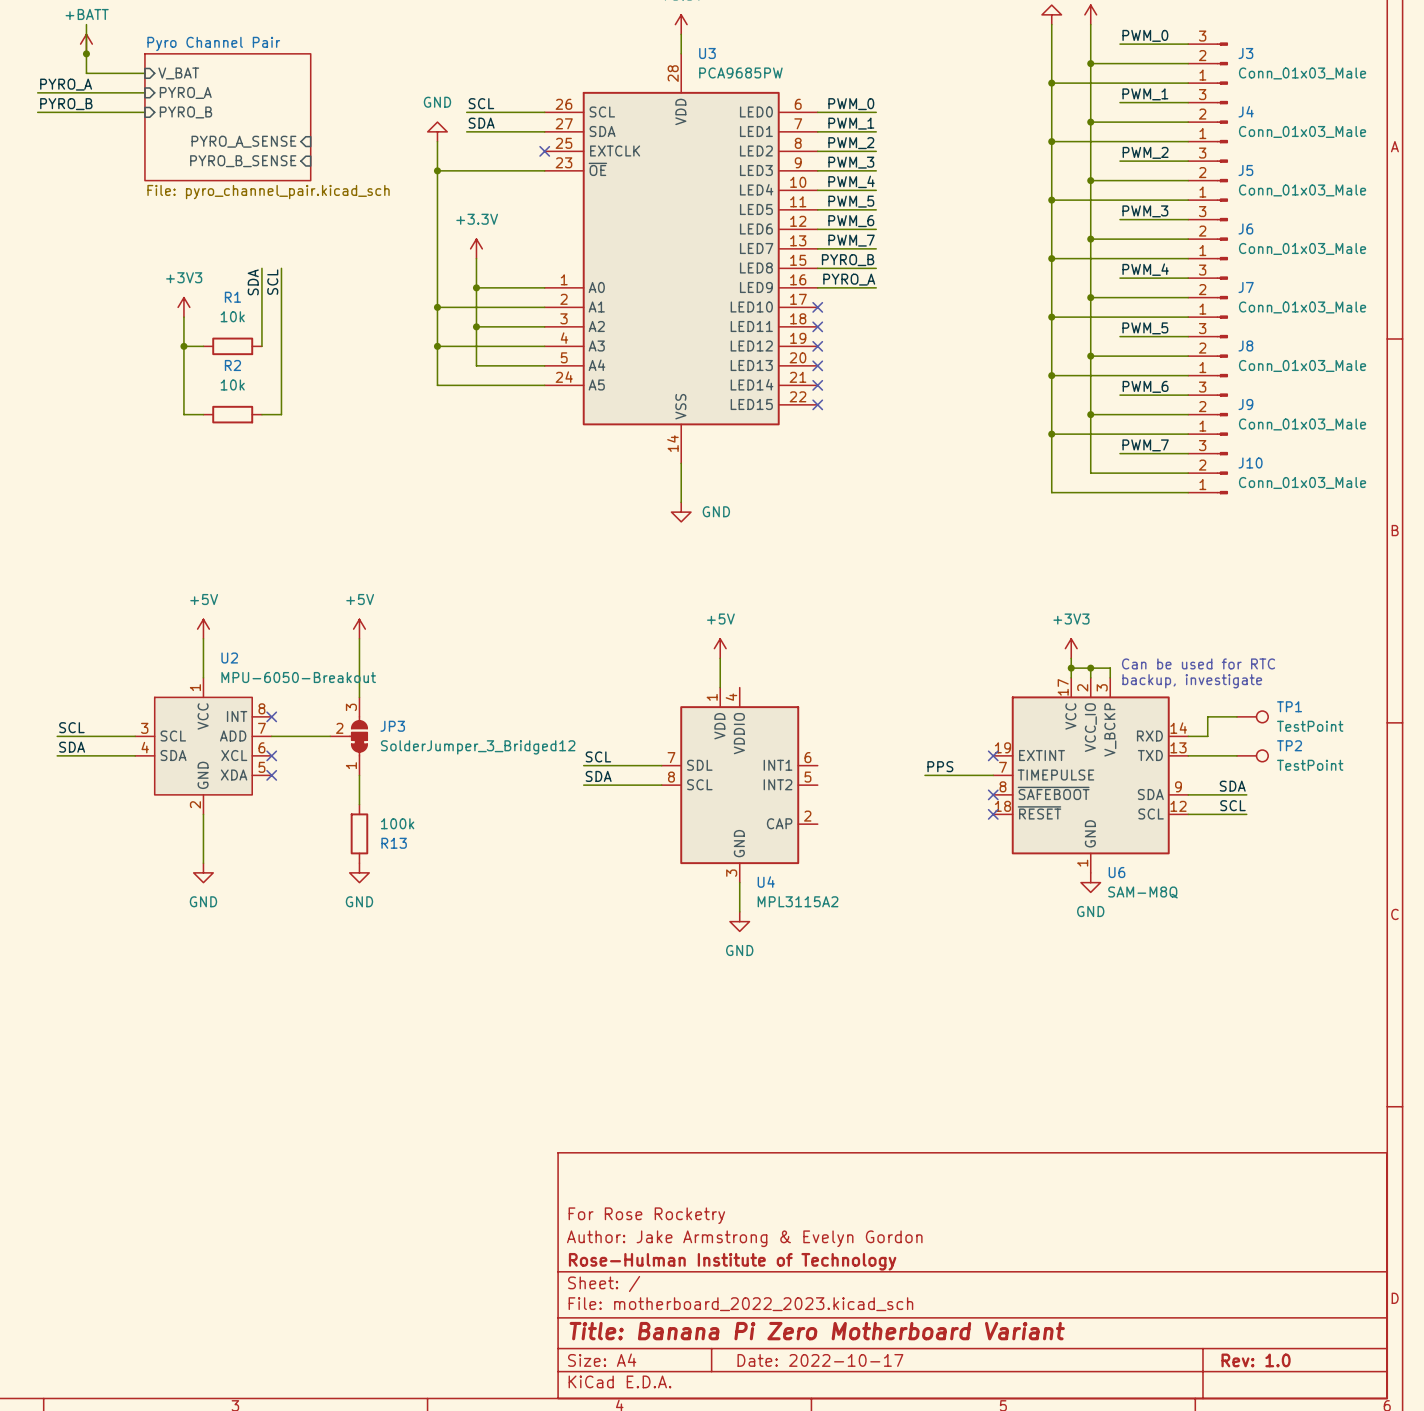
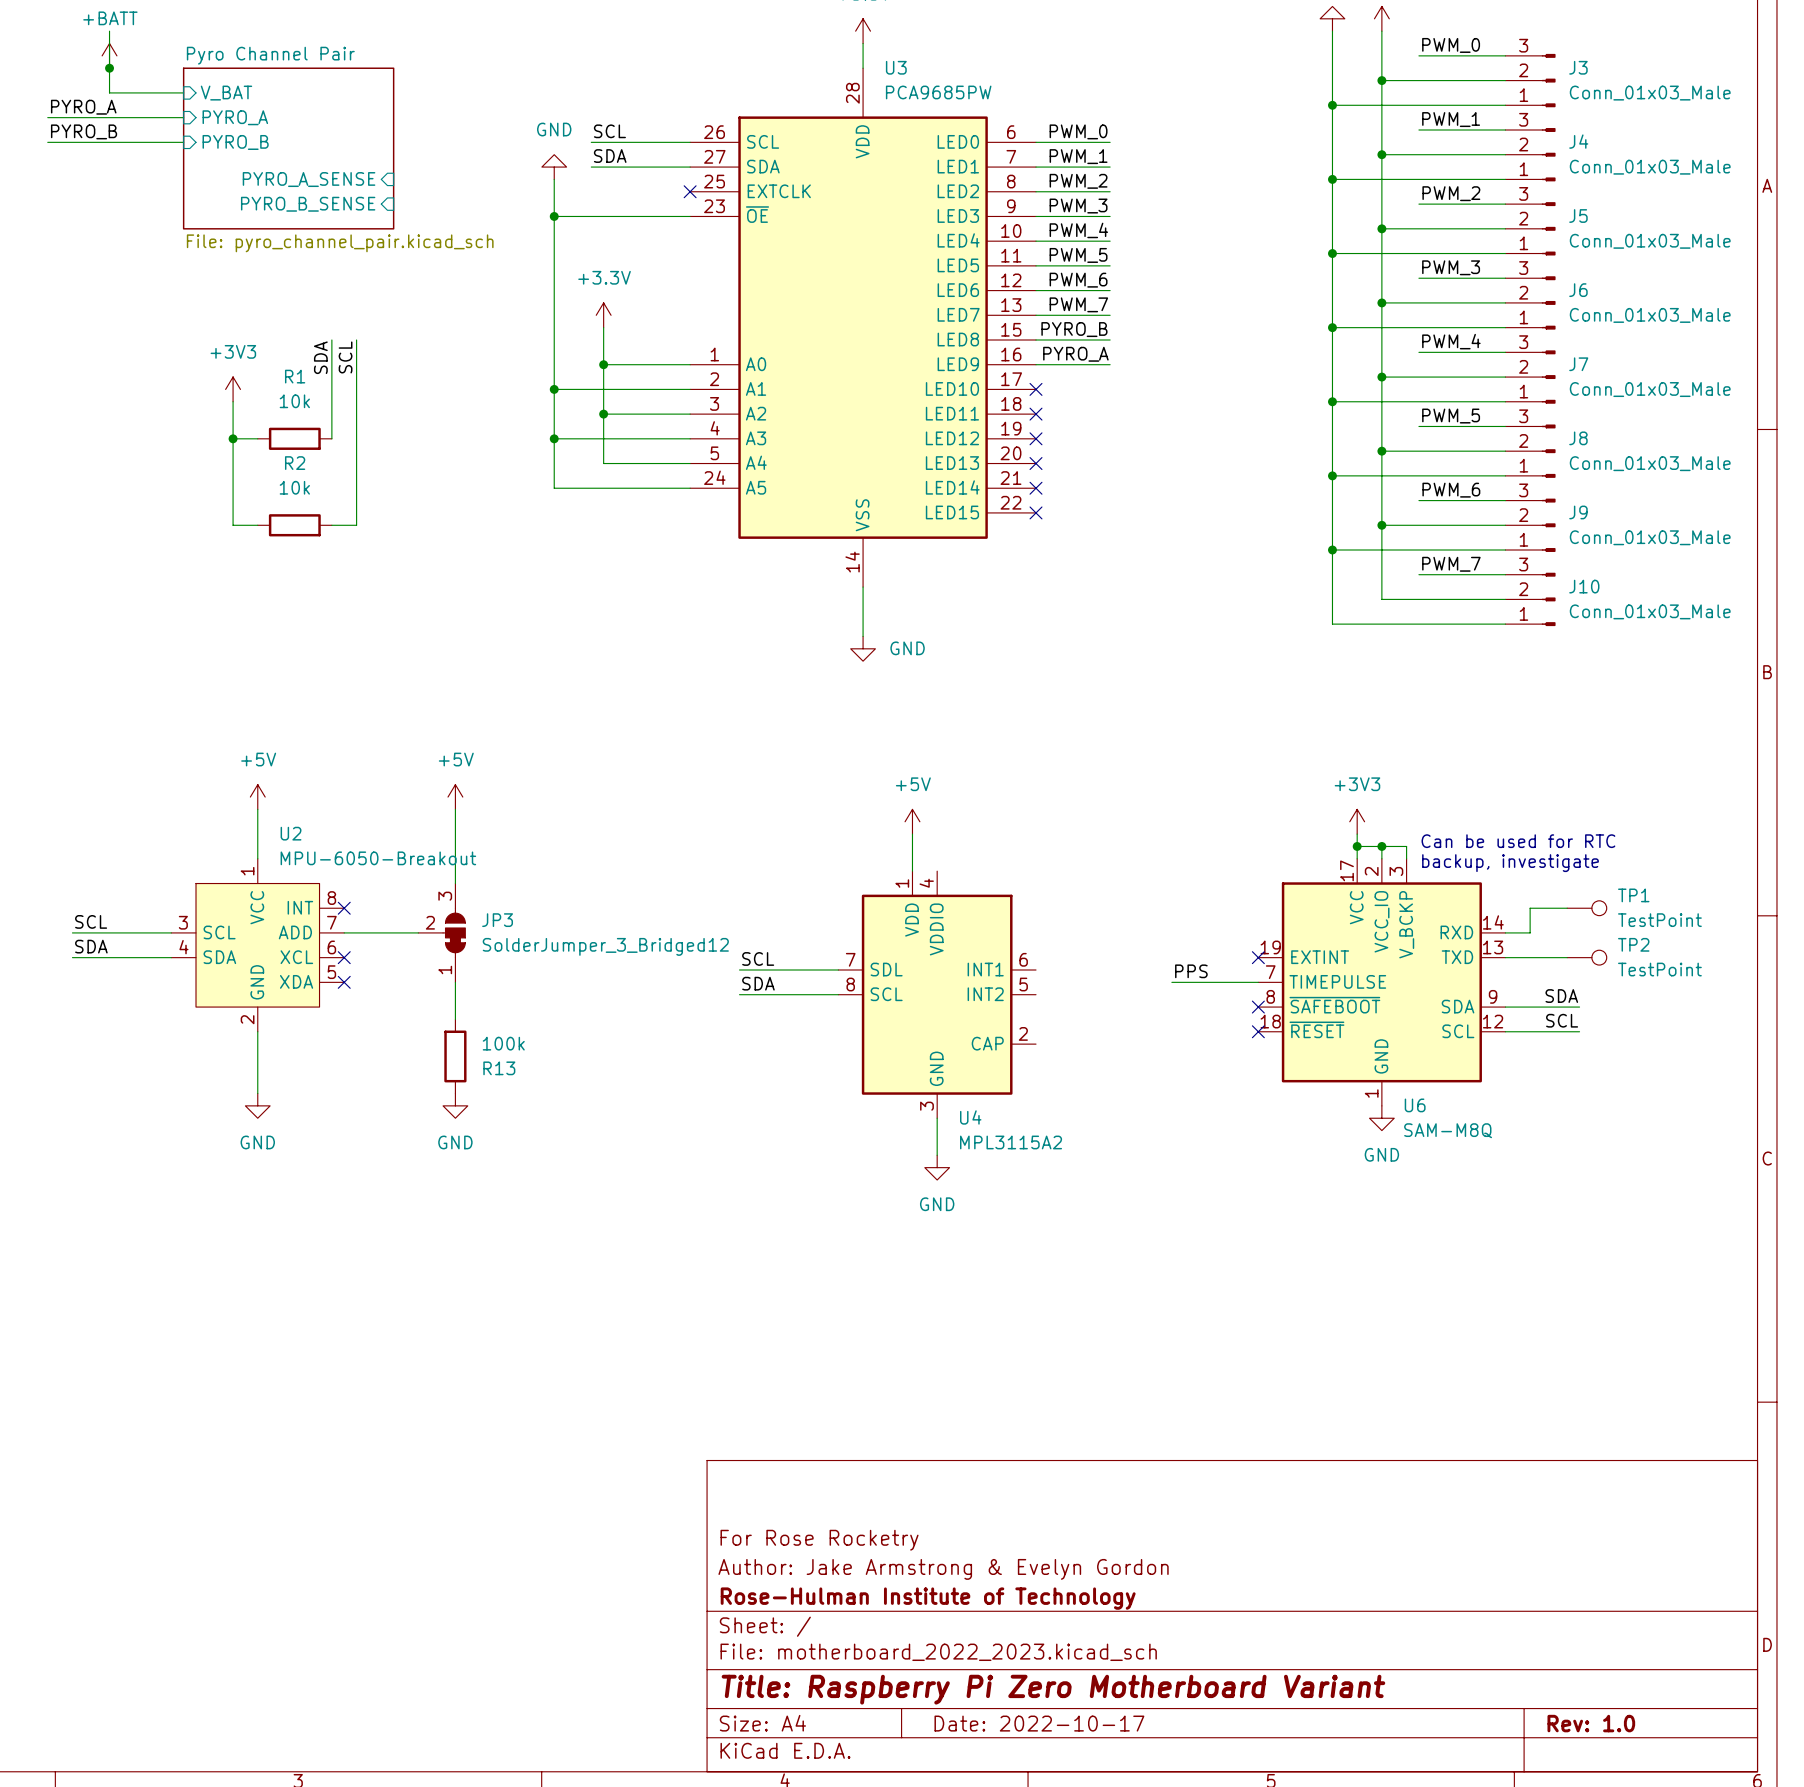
title block: Title: Banana Pi Zero Motherboard Variant (817, 1331) -> Title: Raspberry Pi Zero Motherboard Variant (1053, 1689)

